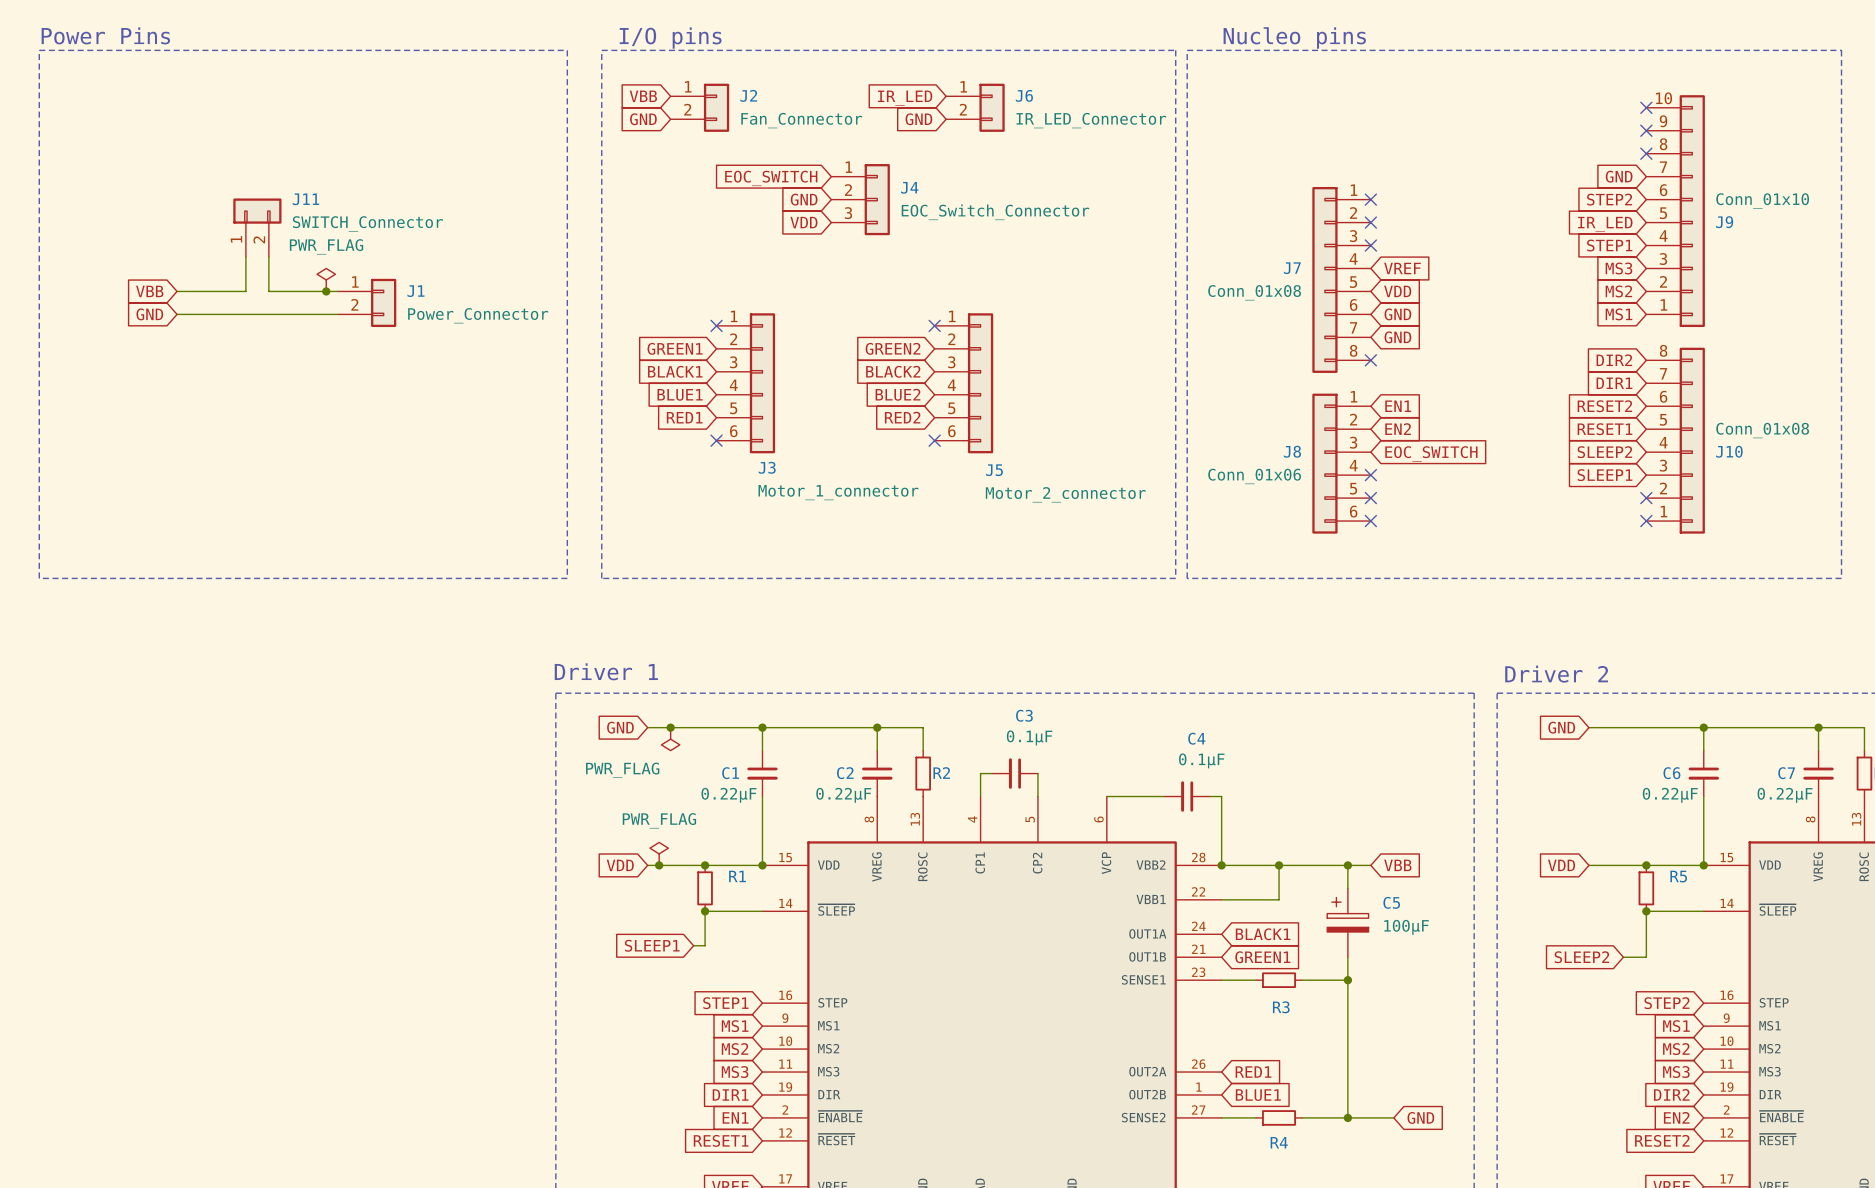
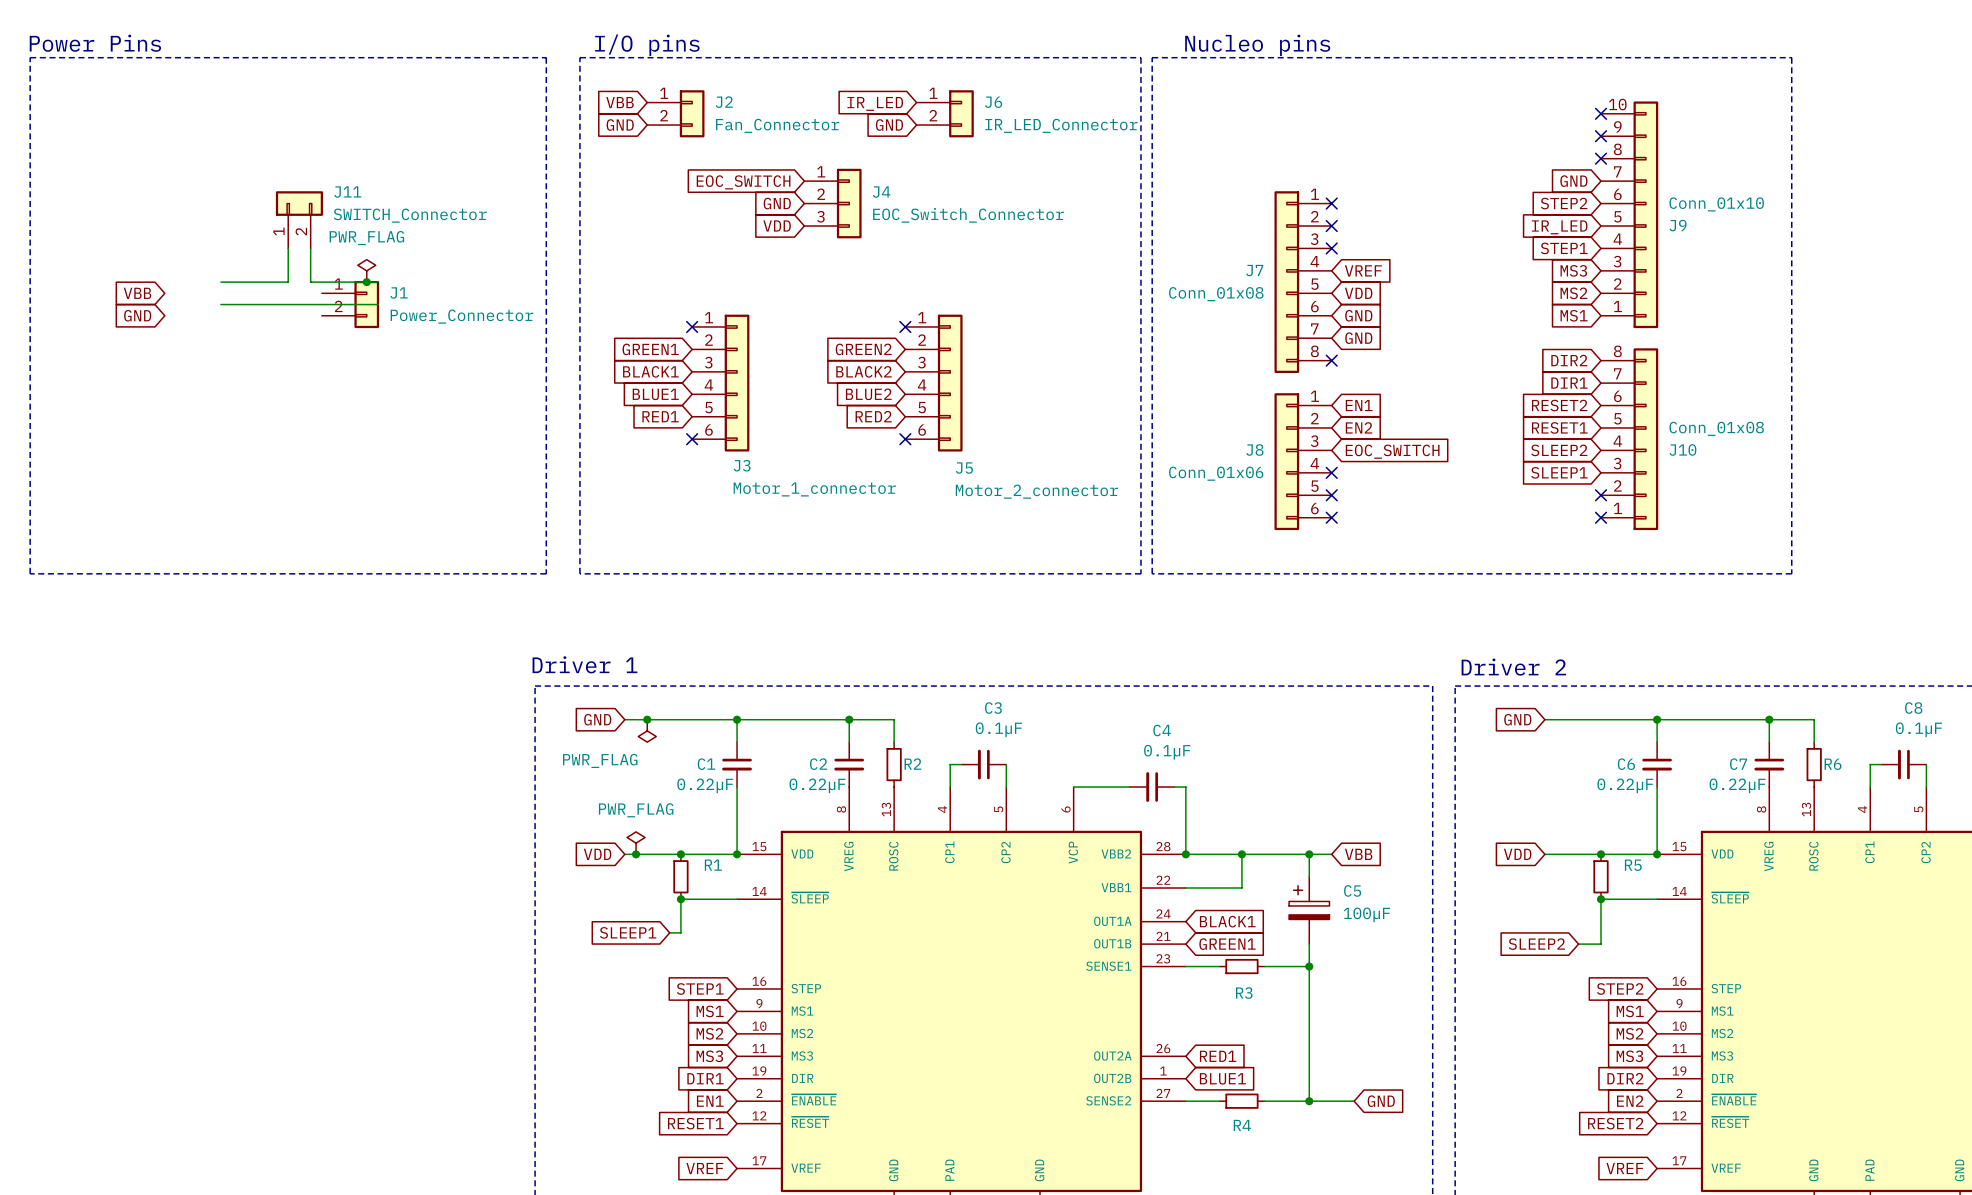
J11 position: (257, 227) -> (299, 219)
wire: (245, 257) (245, 291) (177, 291) -> (288, 248) (288, 282) (220, 282)
wire: (268, 257) (268, 291) (337, 291) -> (310, 248) (310, 282) (377, 282)
power symbol position: PWR_FLAG (326, 279) -> PWR_FLAG (366, 270)
junction: none -> (366, 282)
junction: (326, 291) -> none
wire: (177, 314) (337, 314) -> (220, 304) (377, 304)

